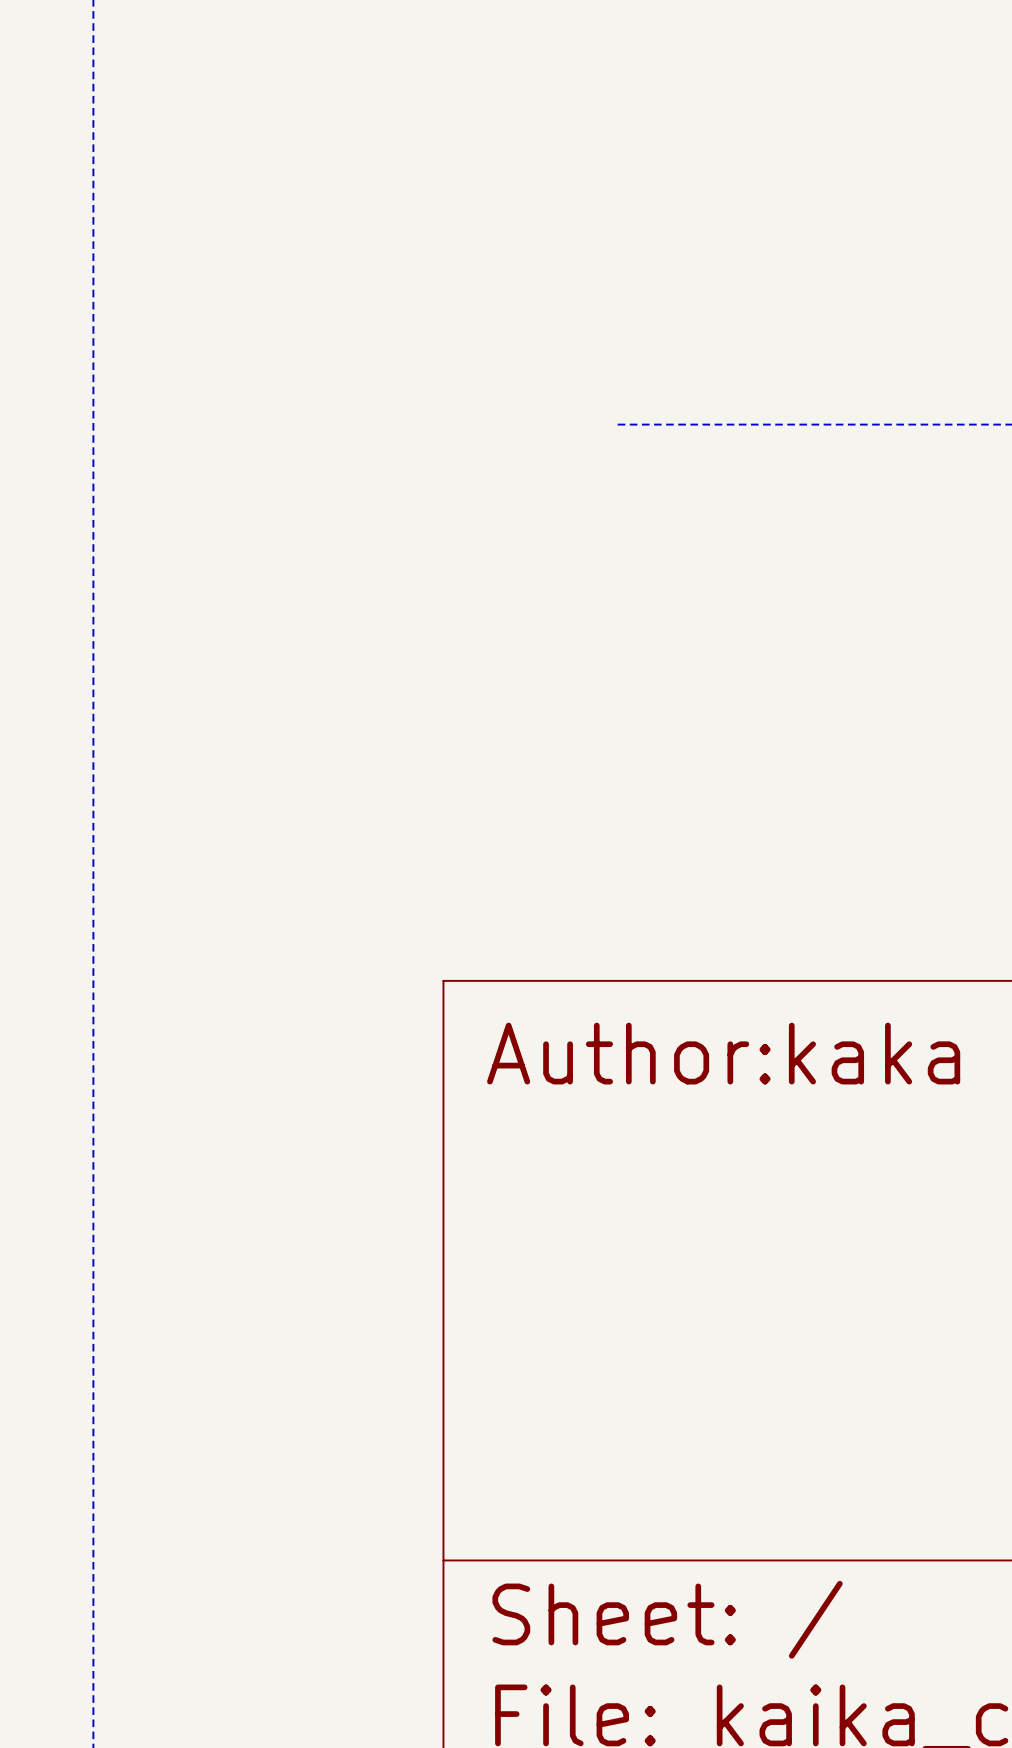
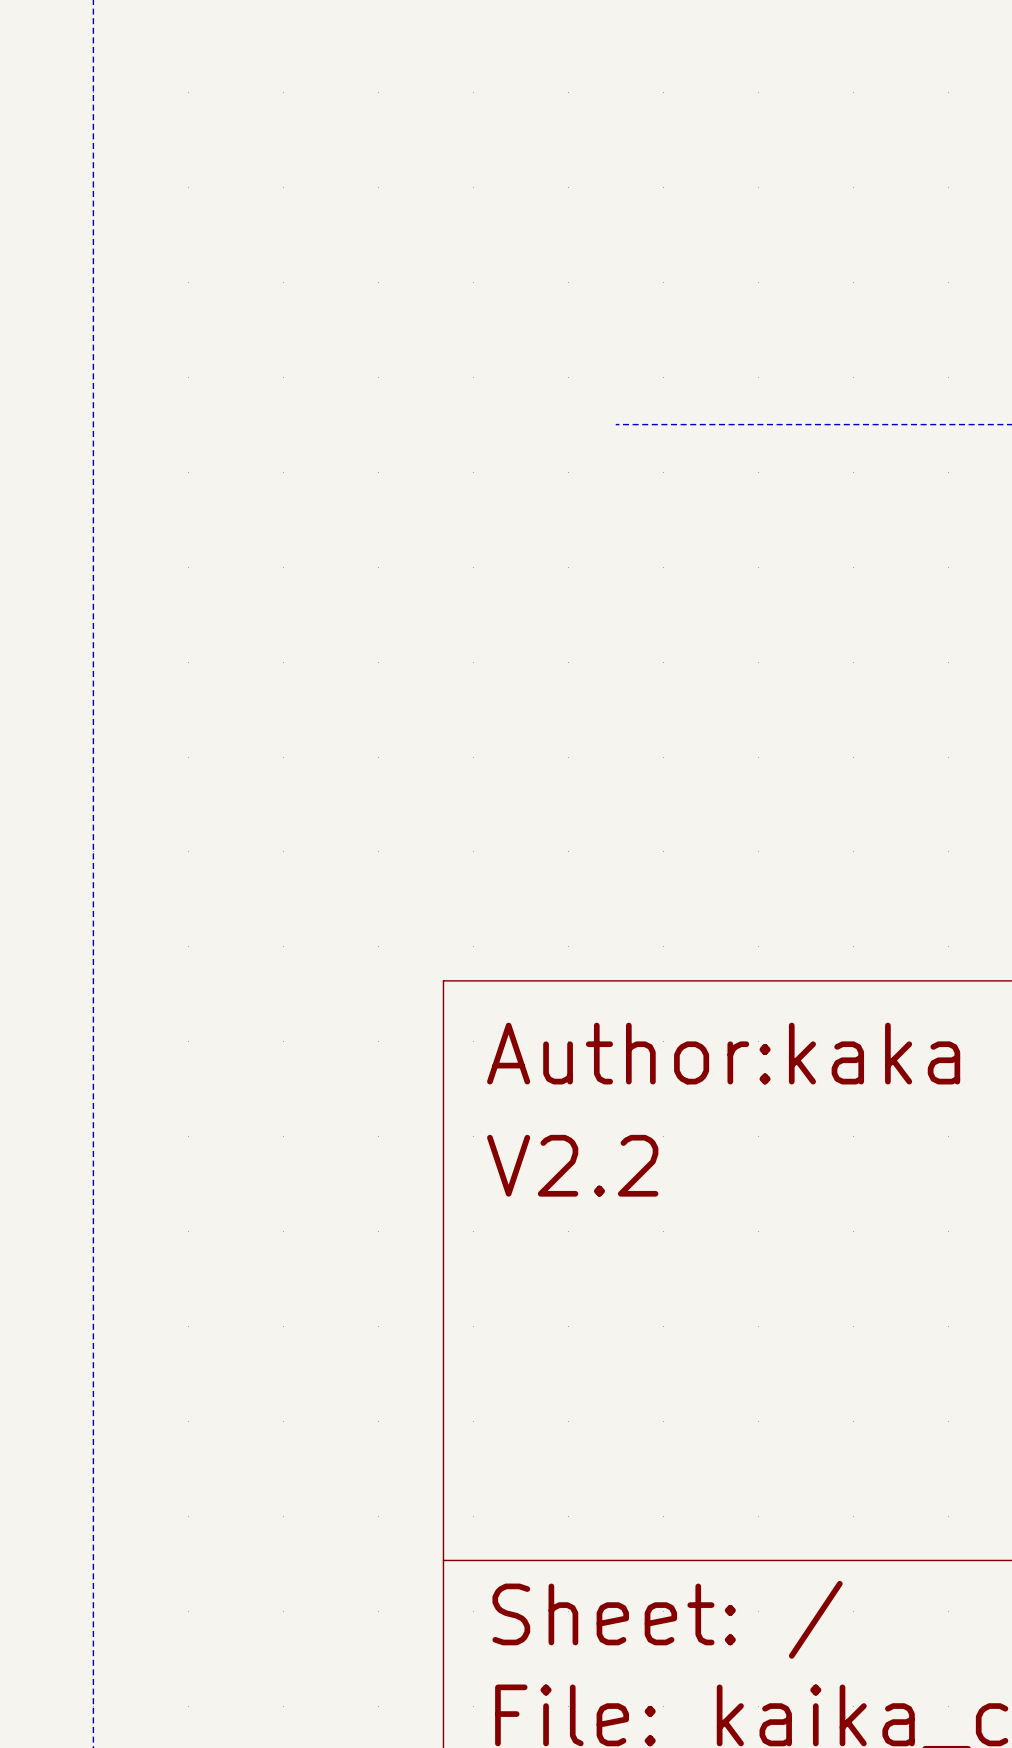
title block: none -> V2.2 (572, 1165)

